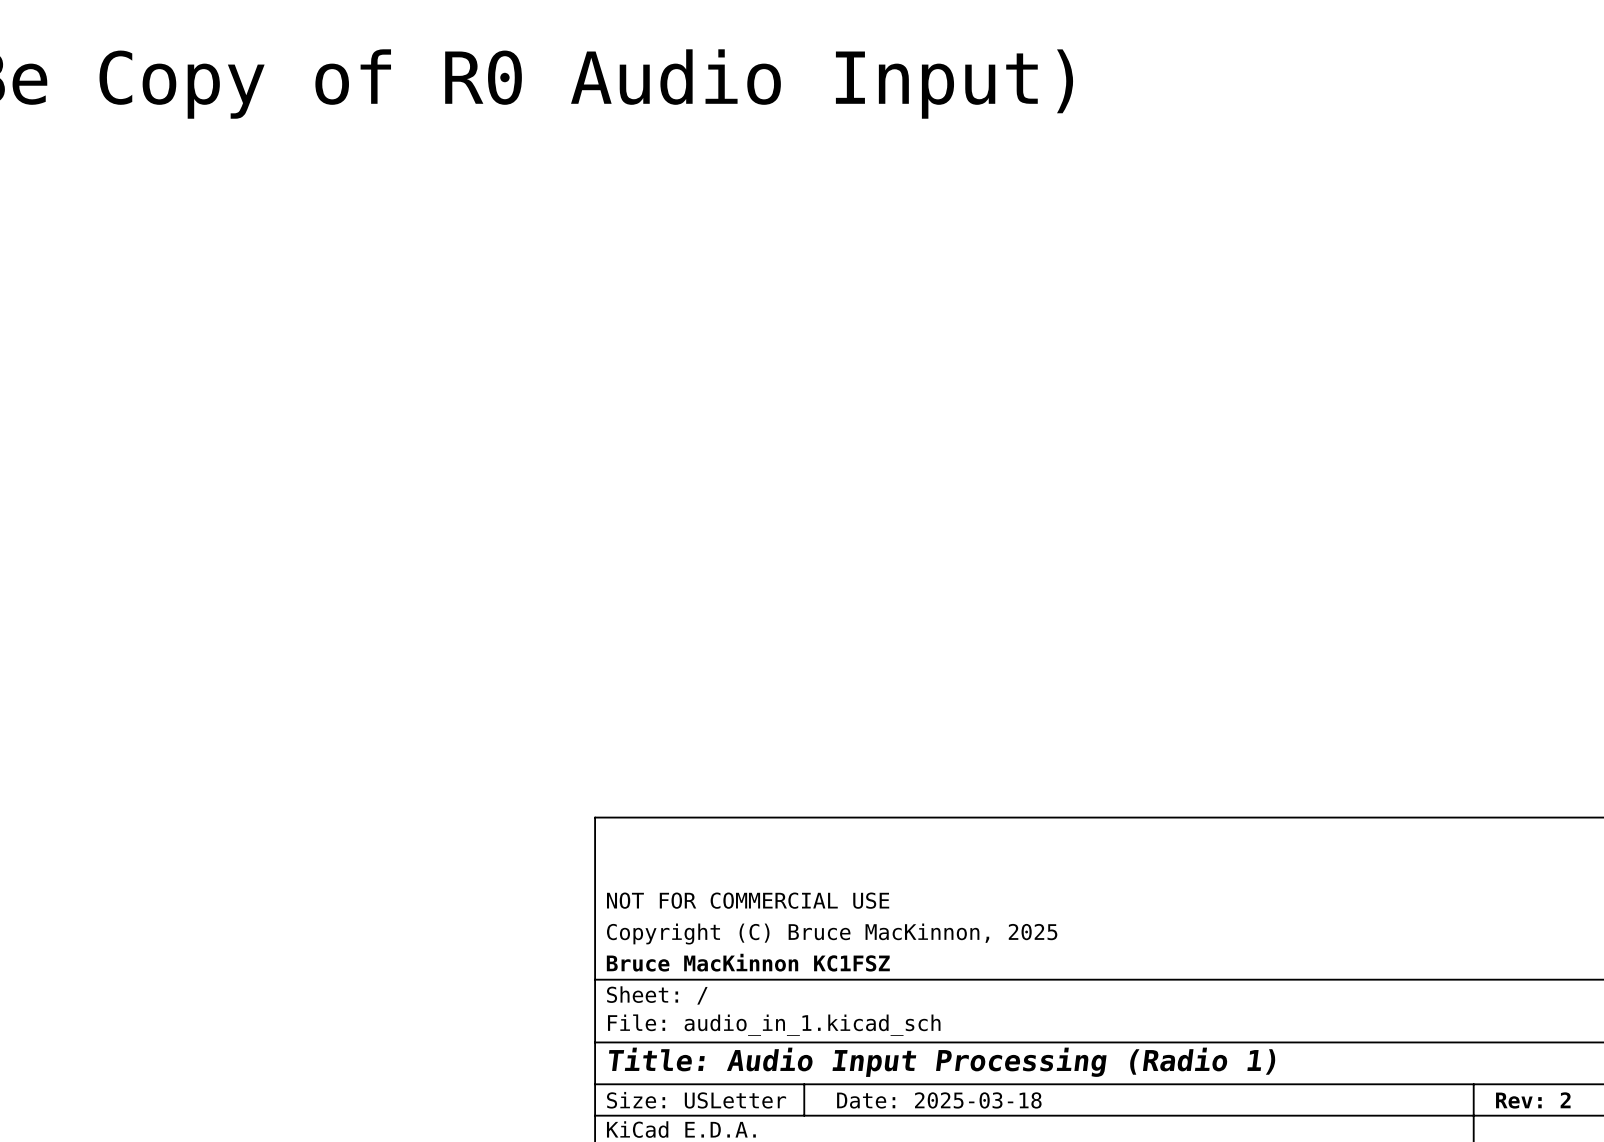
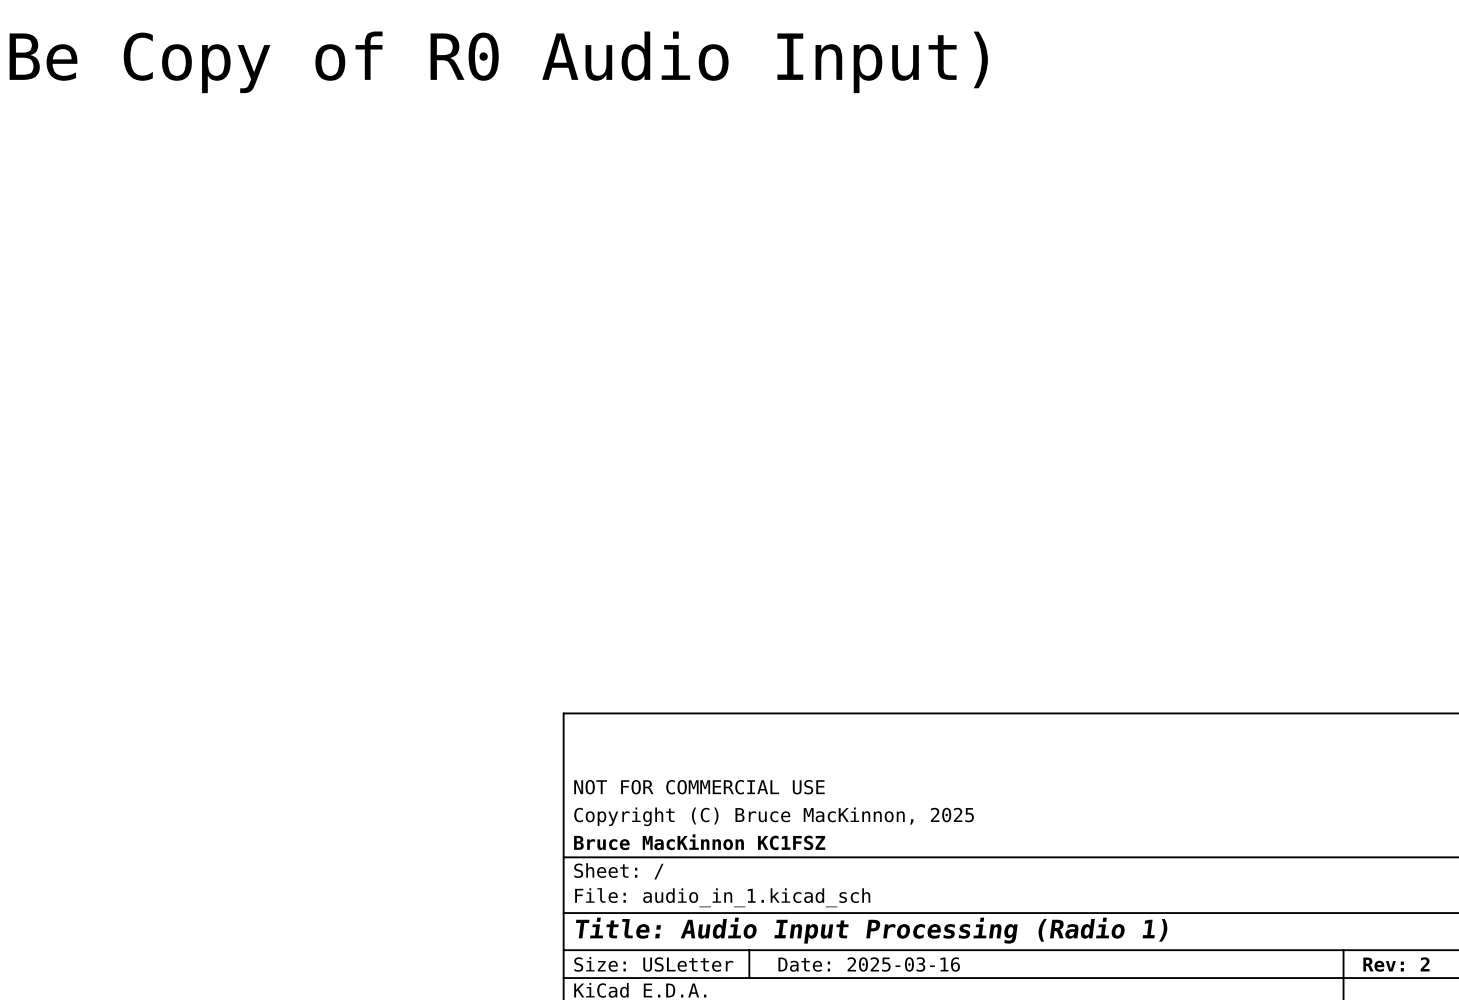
title block: Date: 2025-03-18 (939, 1100) -> Date: 2025-03-16 (869, 964)

